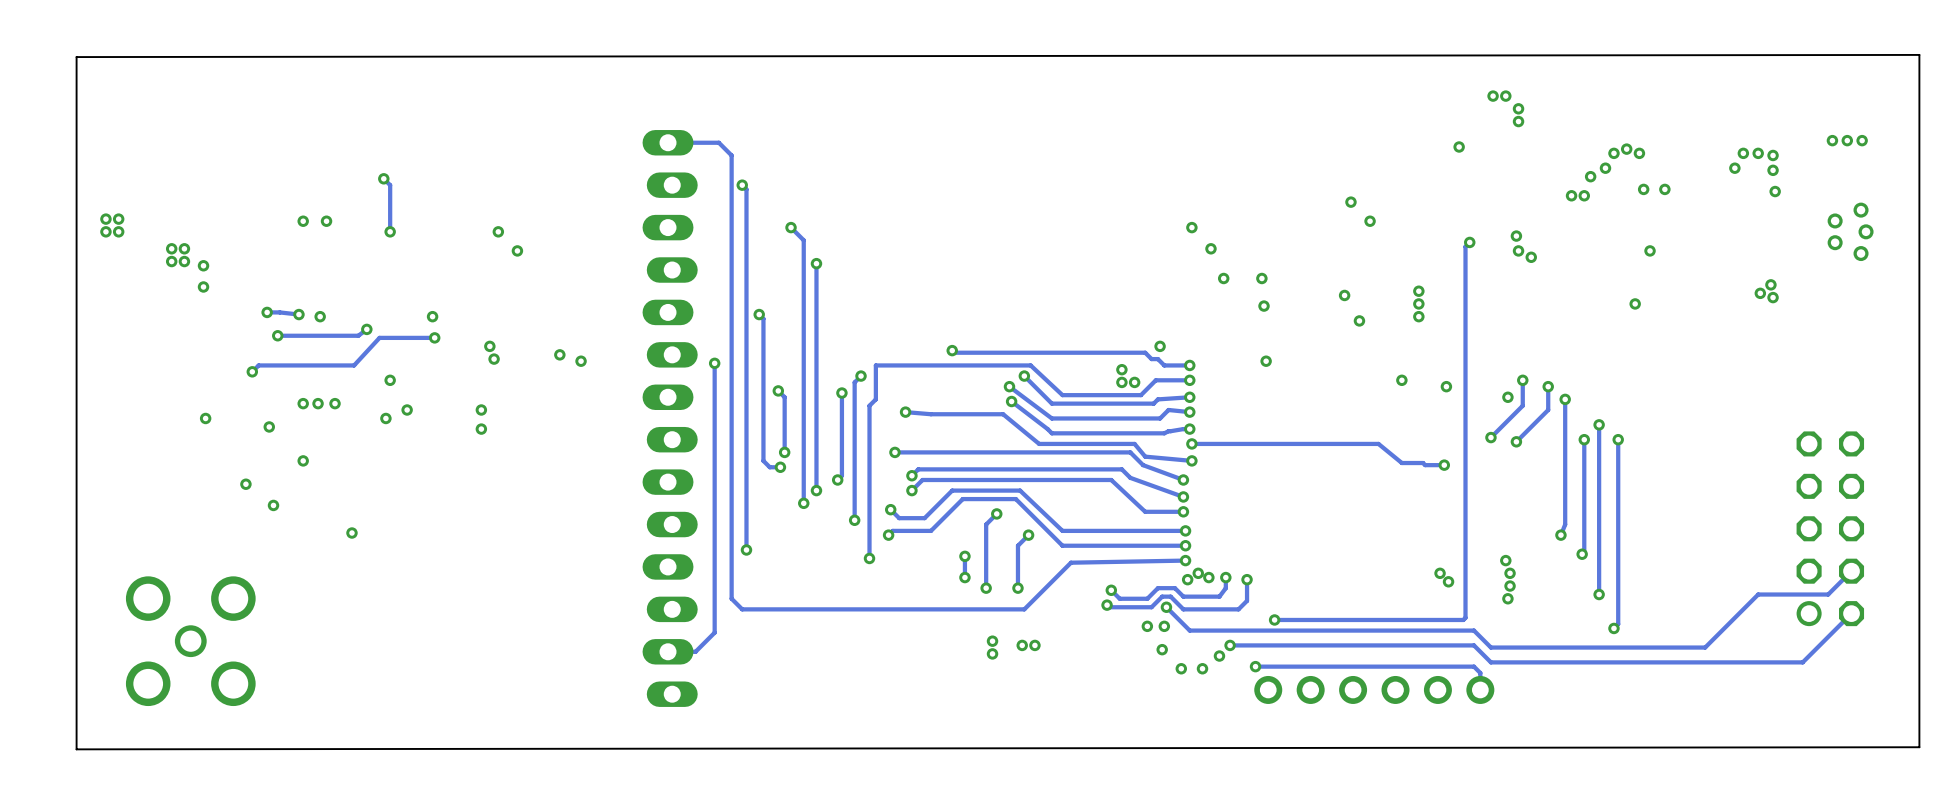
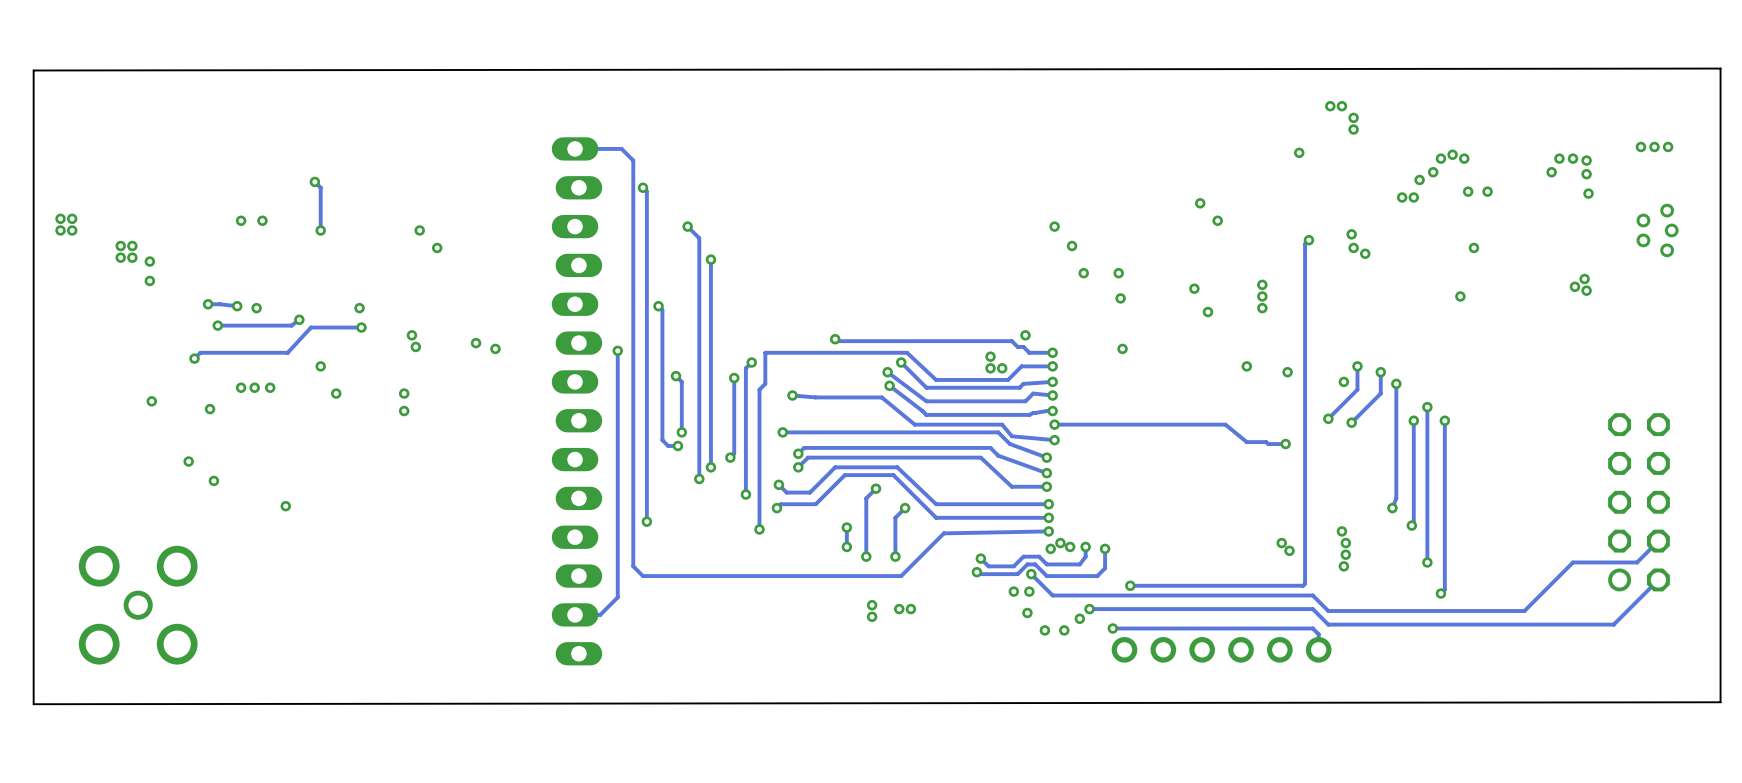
via: (385, 418) -> none
via: (303, 460) -> none

